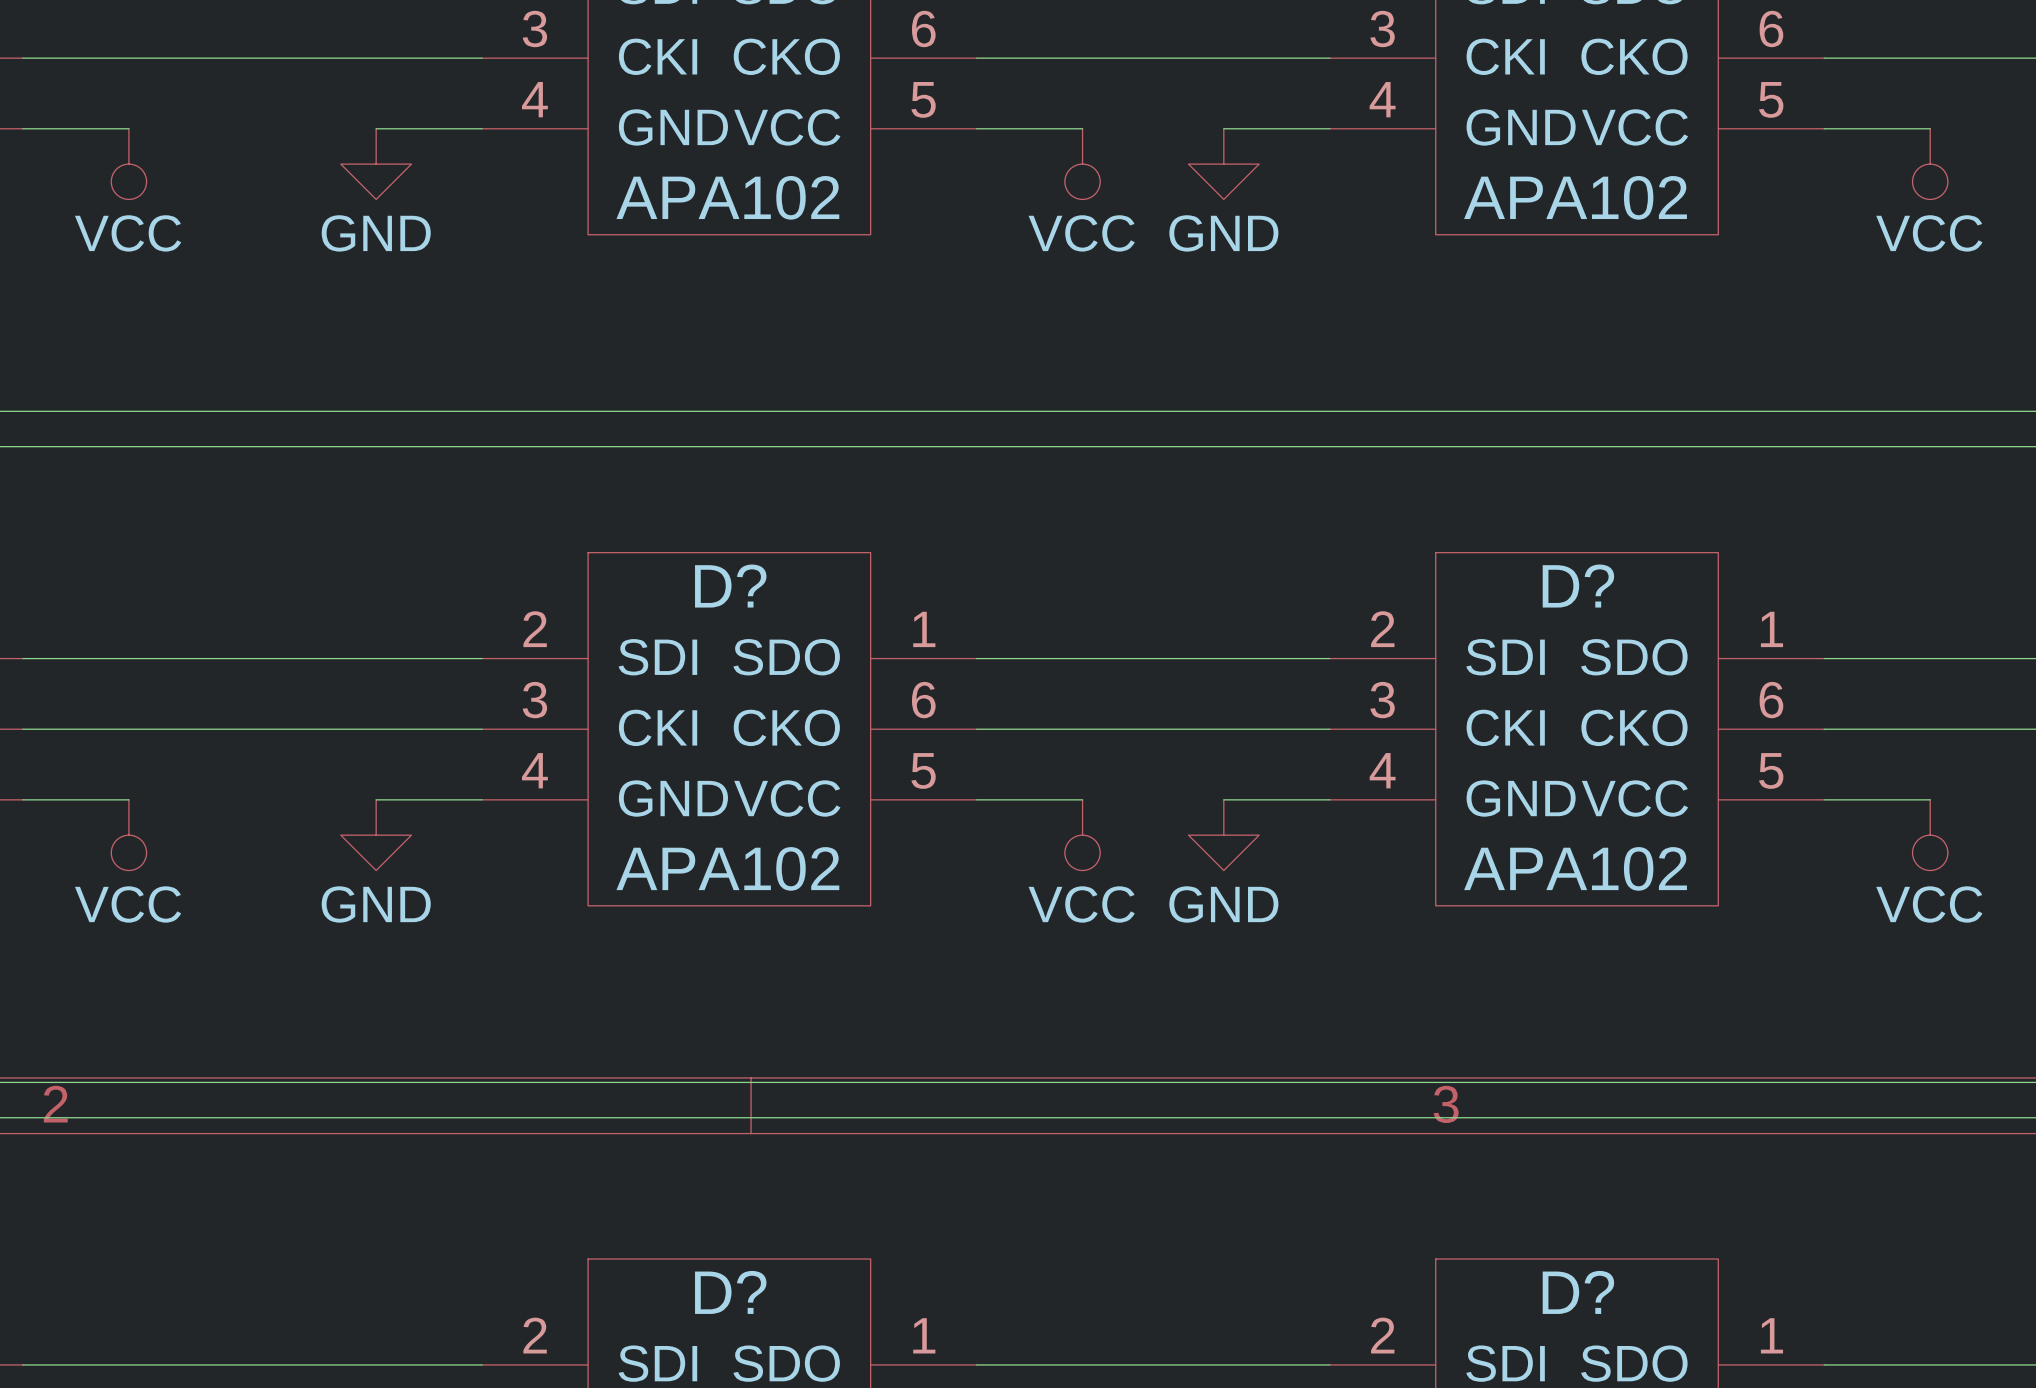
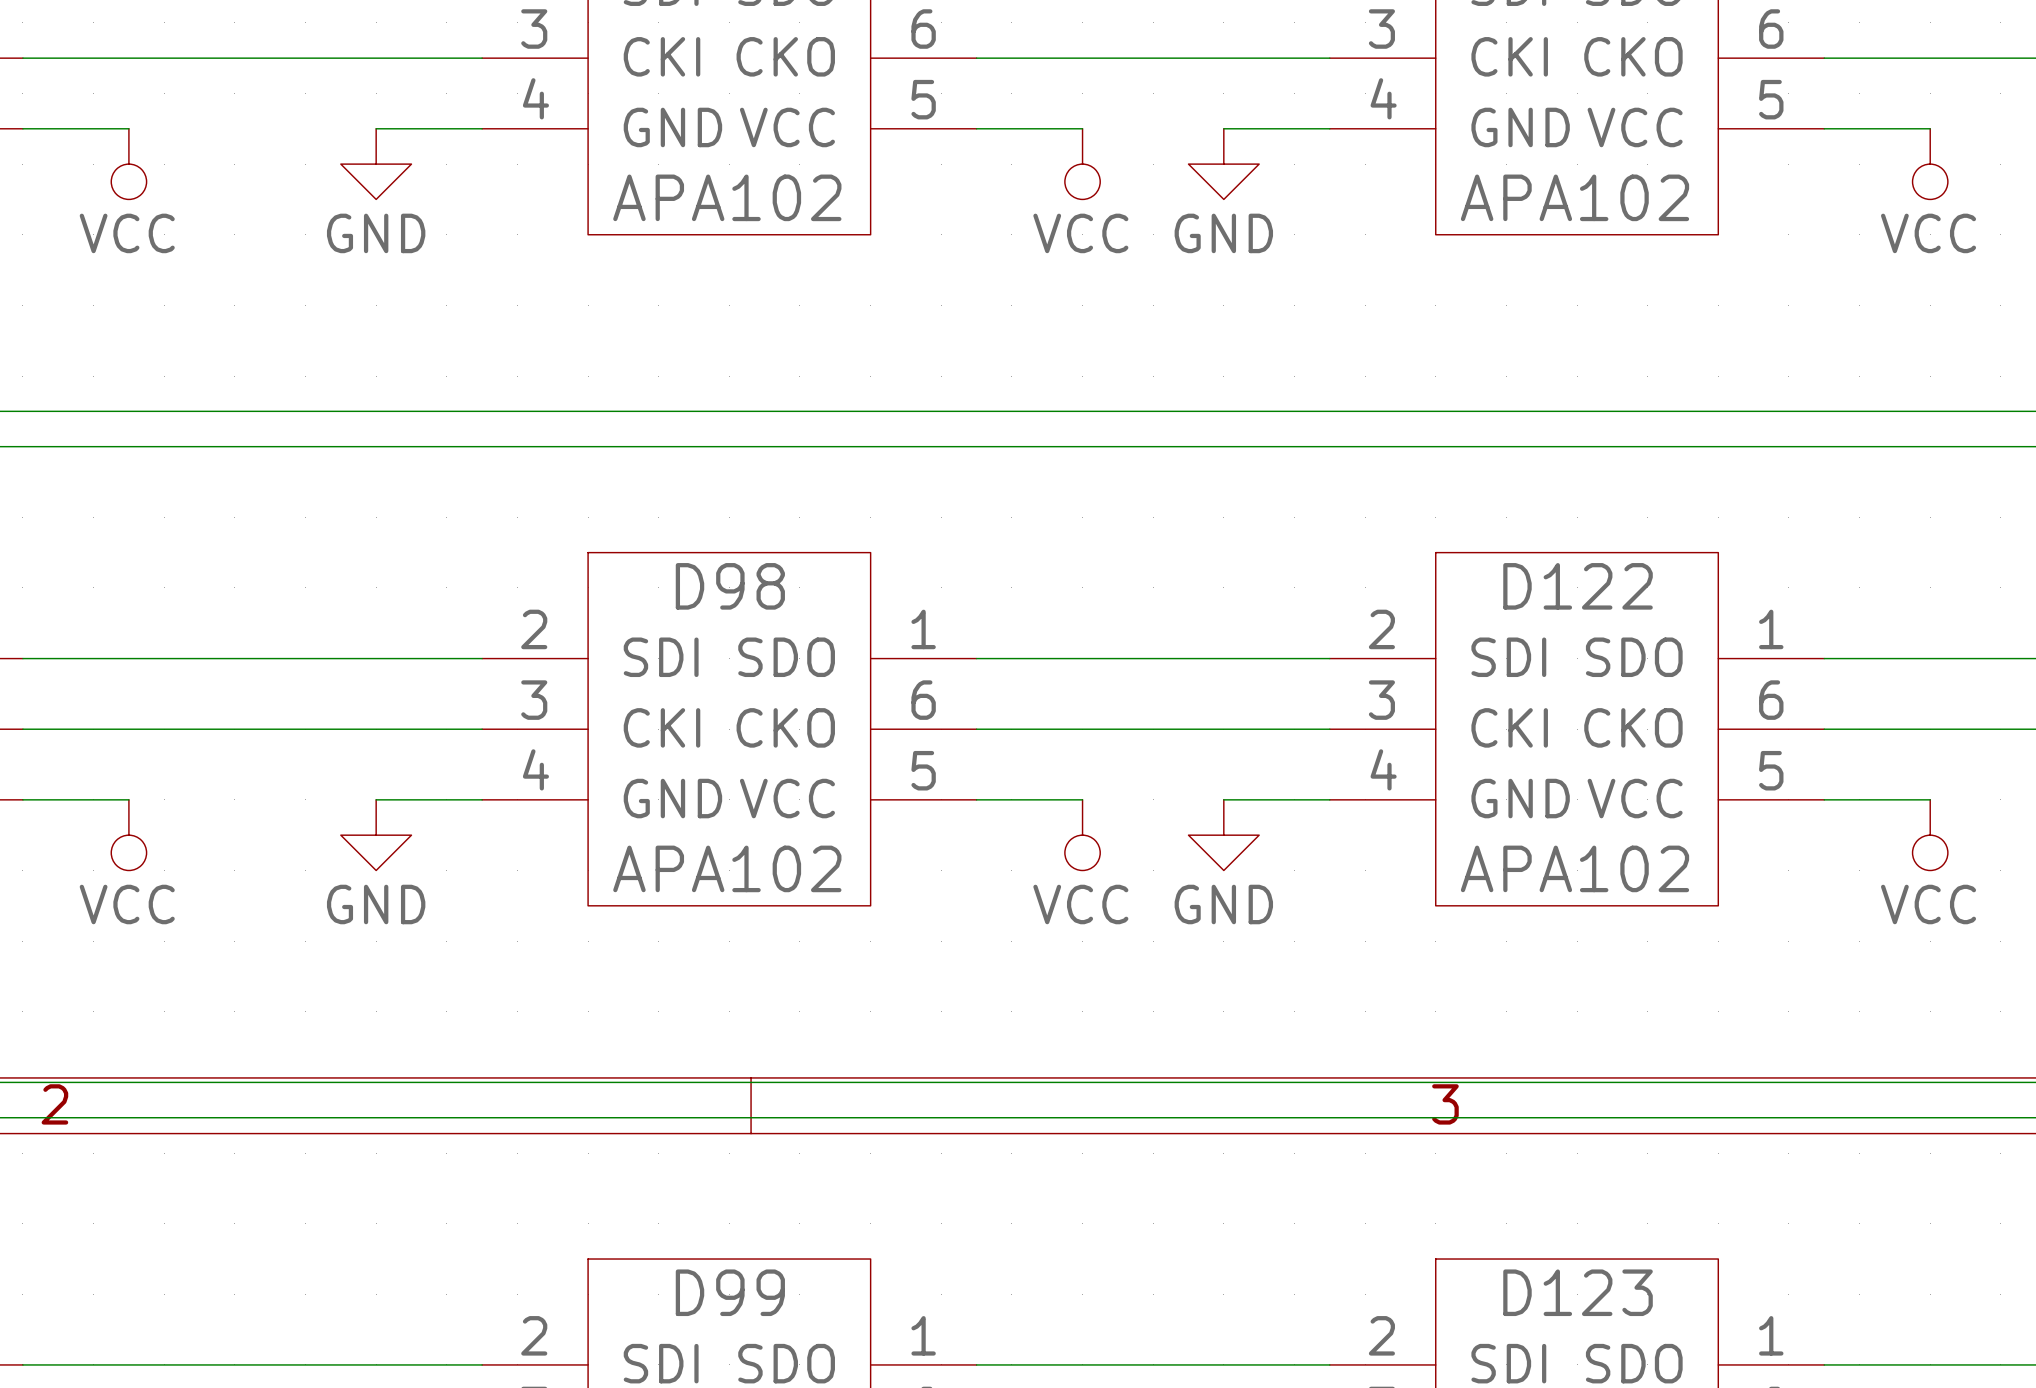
D? name: D? (730, 586) -> D98 (730, 586)
D? name: D? (1578, 586) -> D122 (1578, 586)
D? name: D? (730, 1292) -> D99 (730, 1292)
D? name: D? (1578, 1292) -> D123 (1578, 1292)

